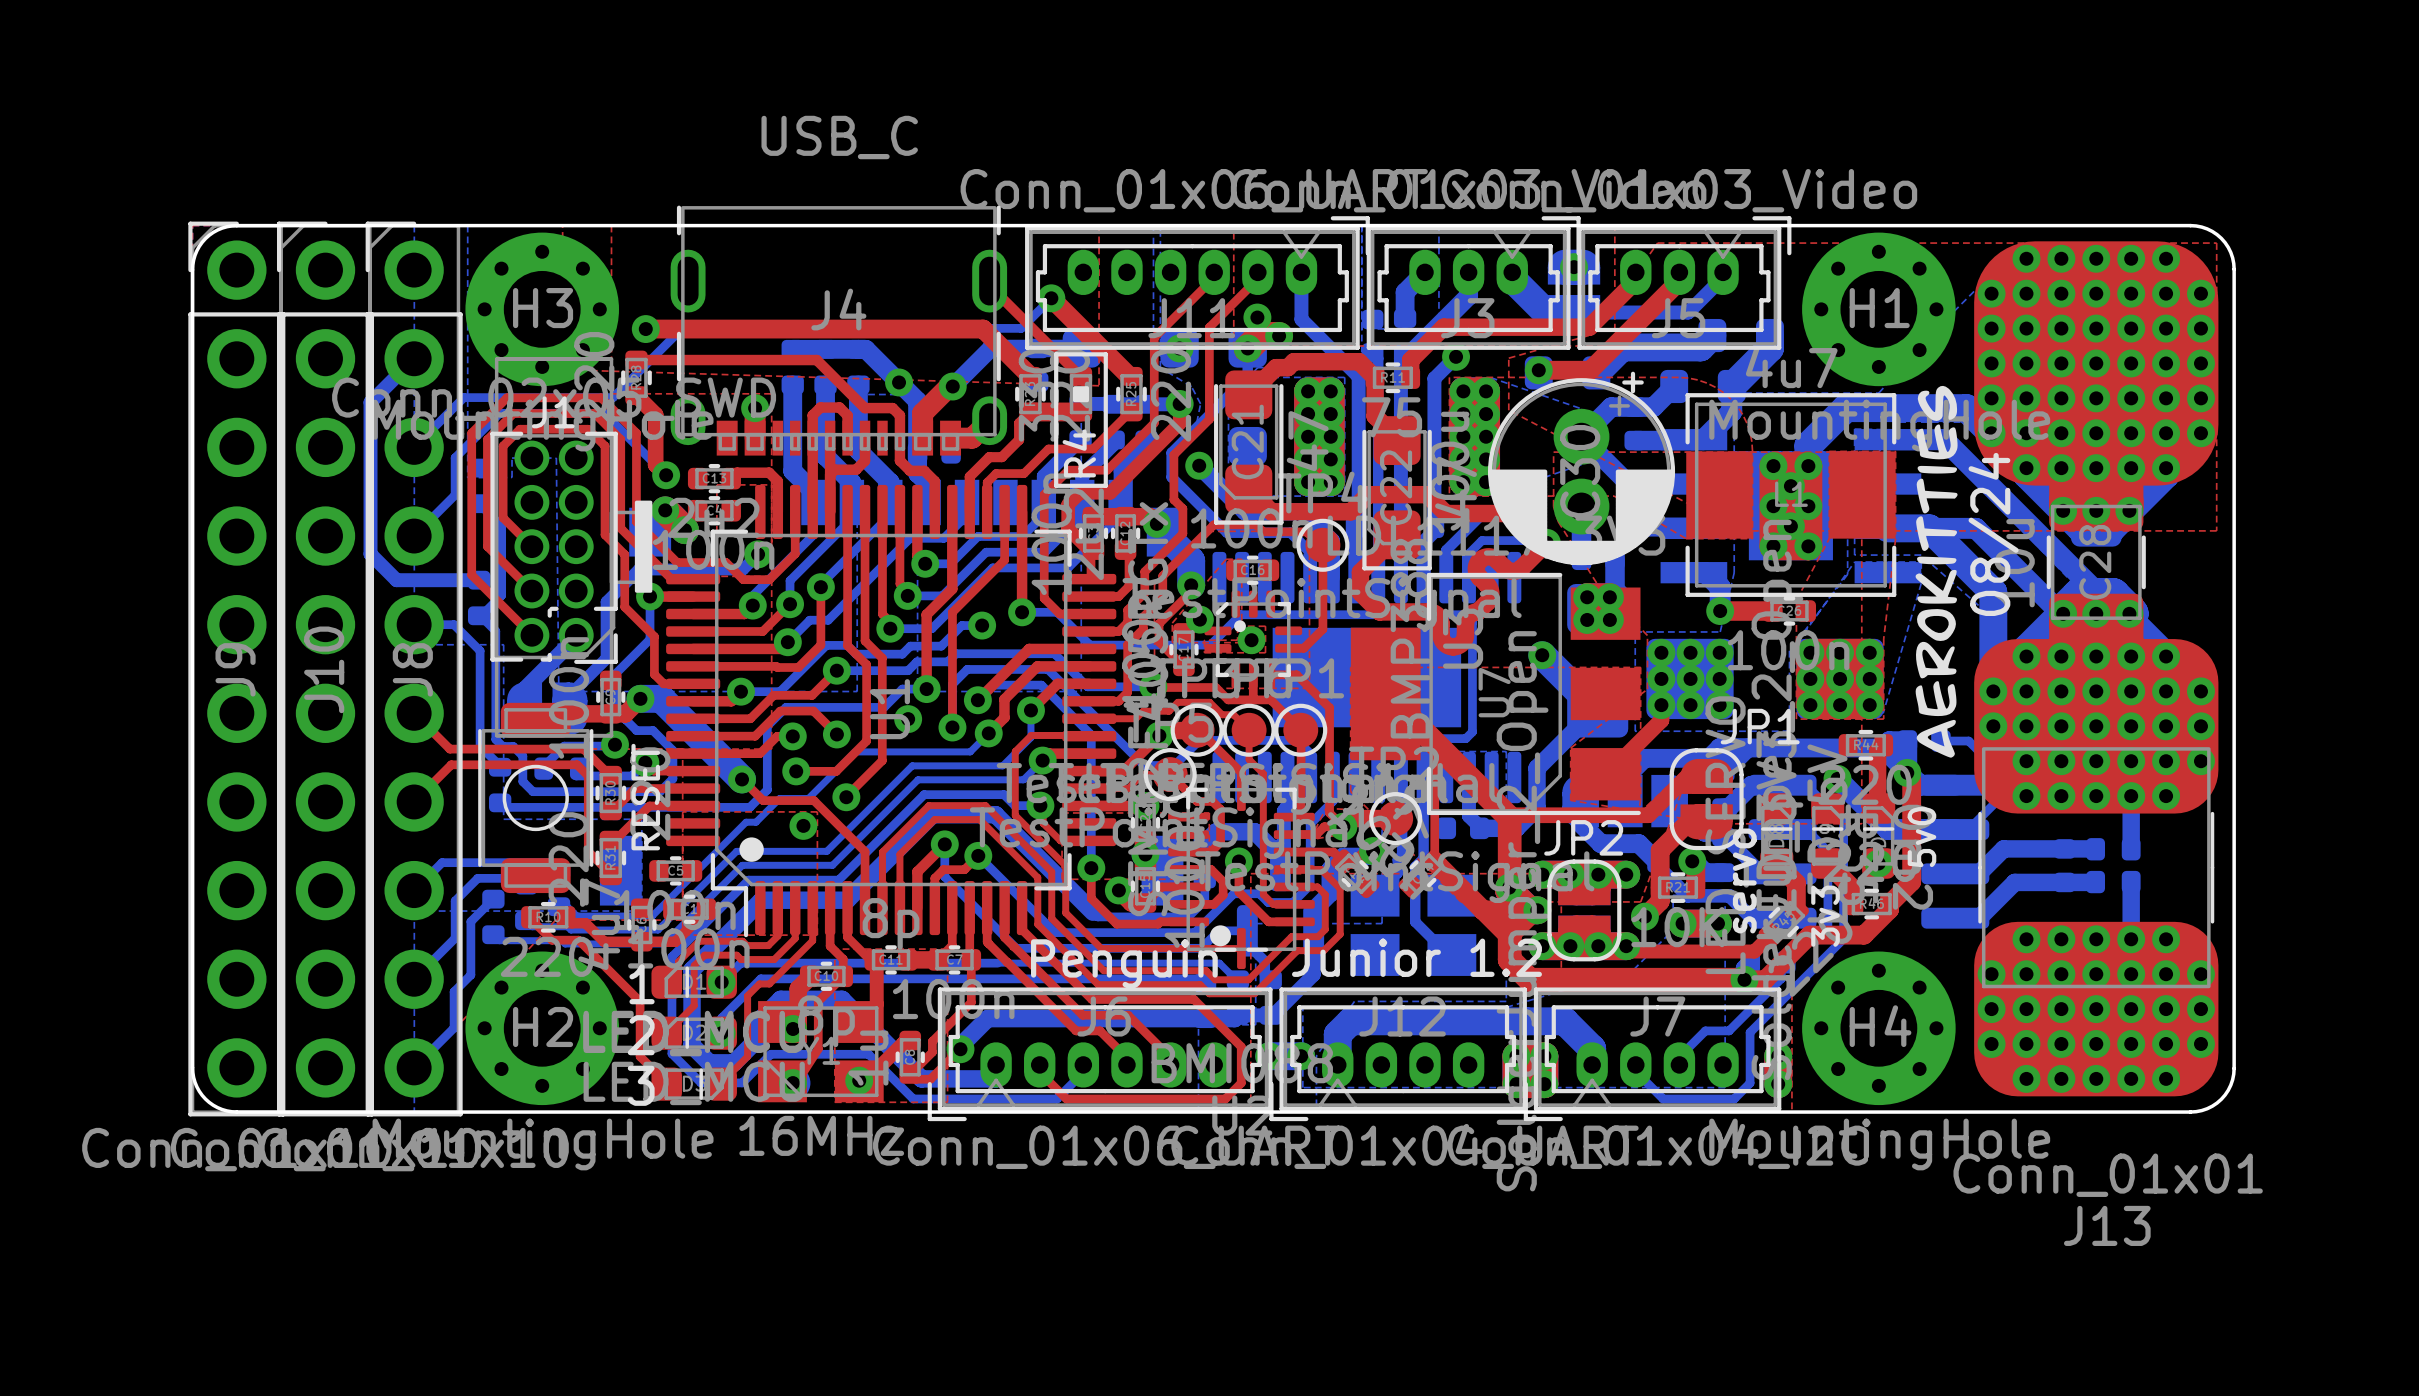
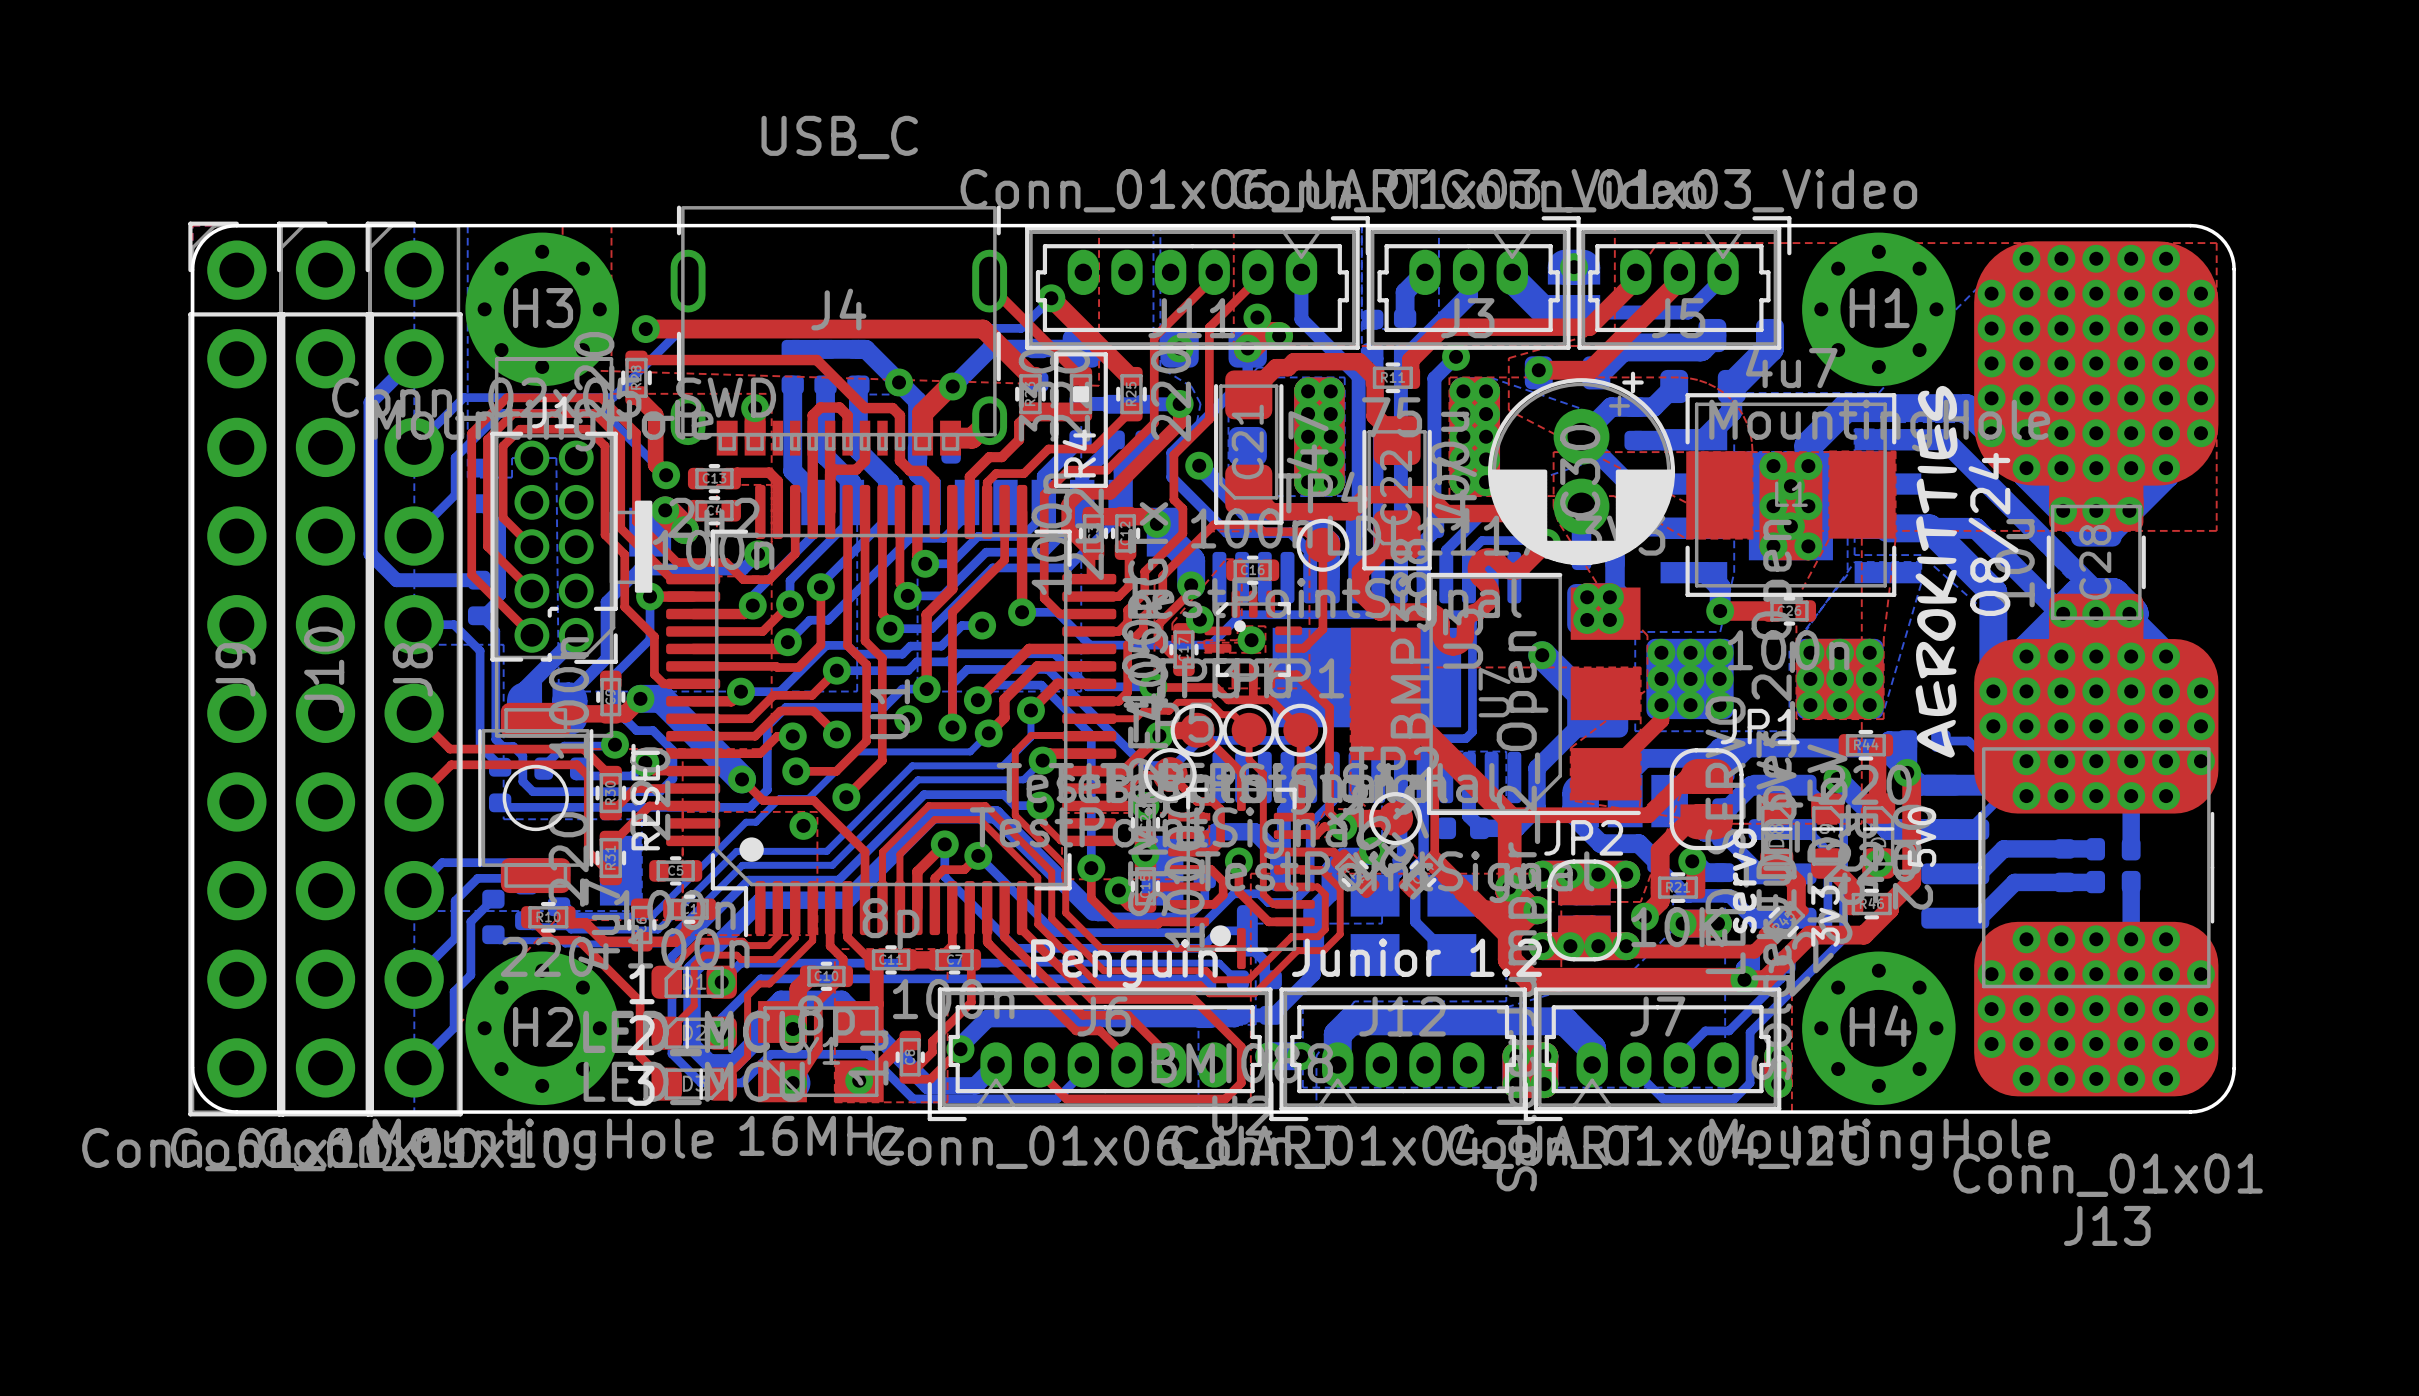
bottom track: (921, 1078) (995, 1078) -> (921, 1078) (928, 1085) (975, 1085) (996, 1064)

